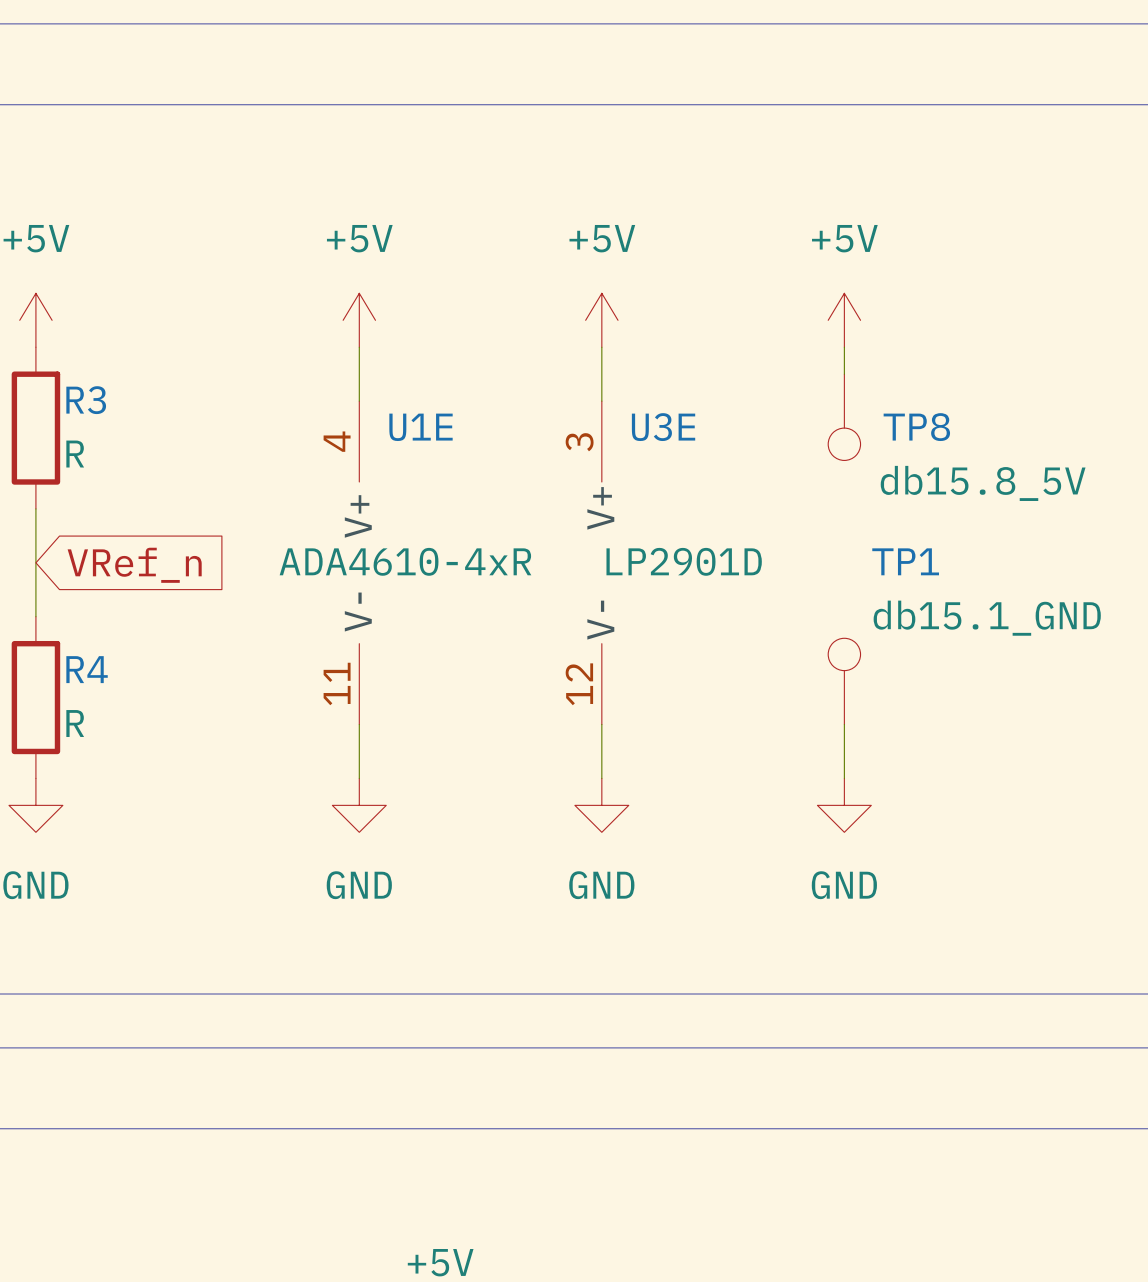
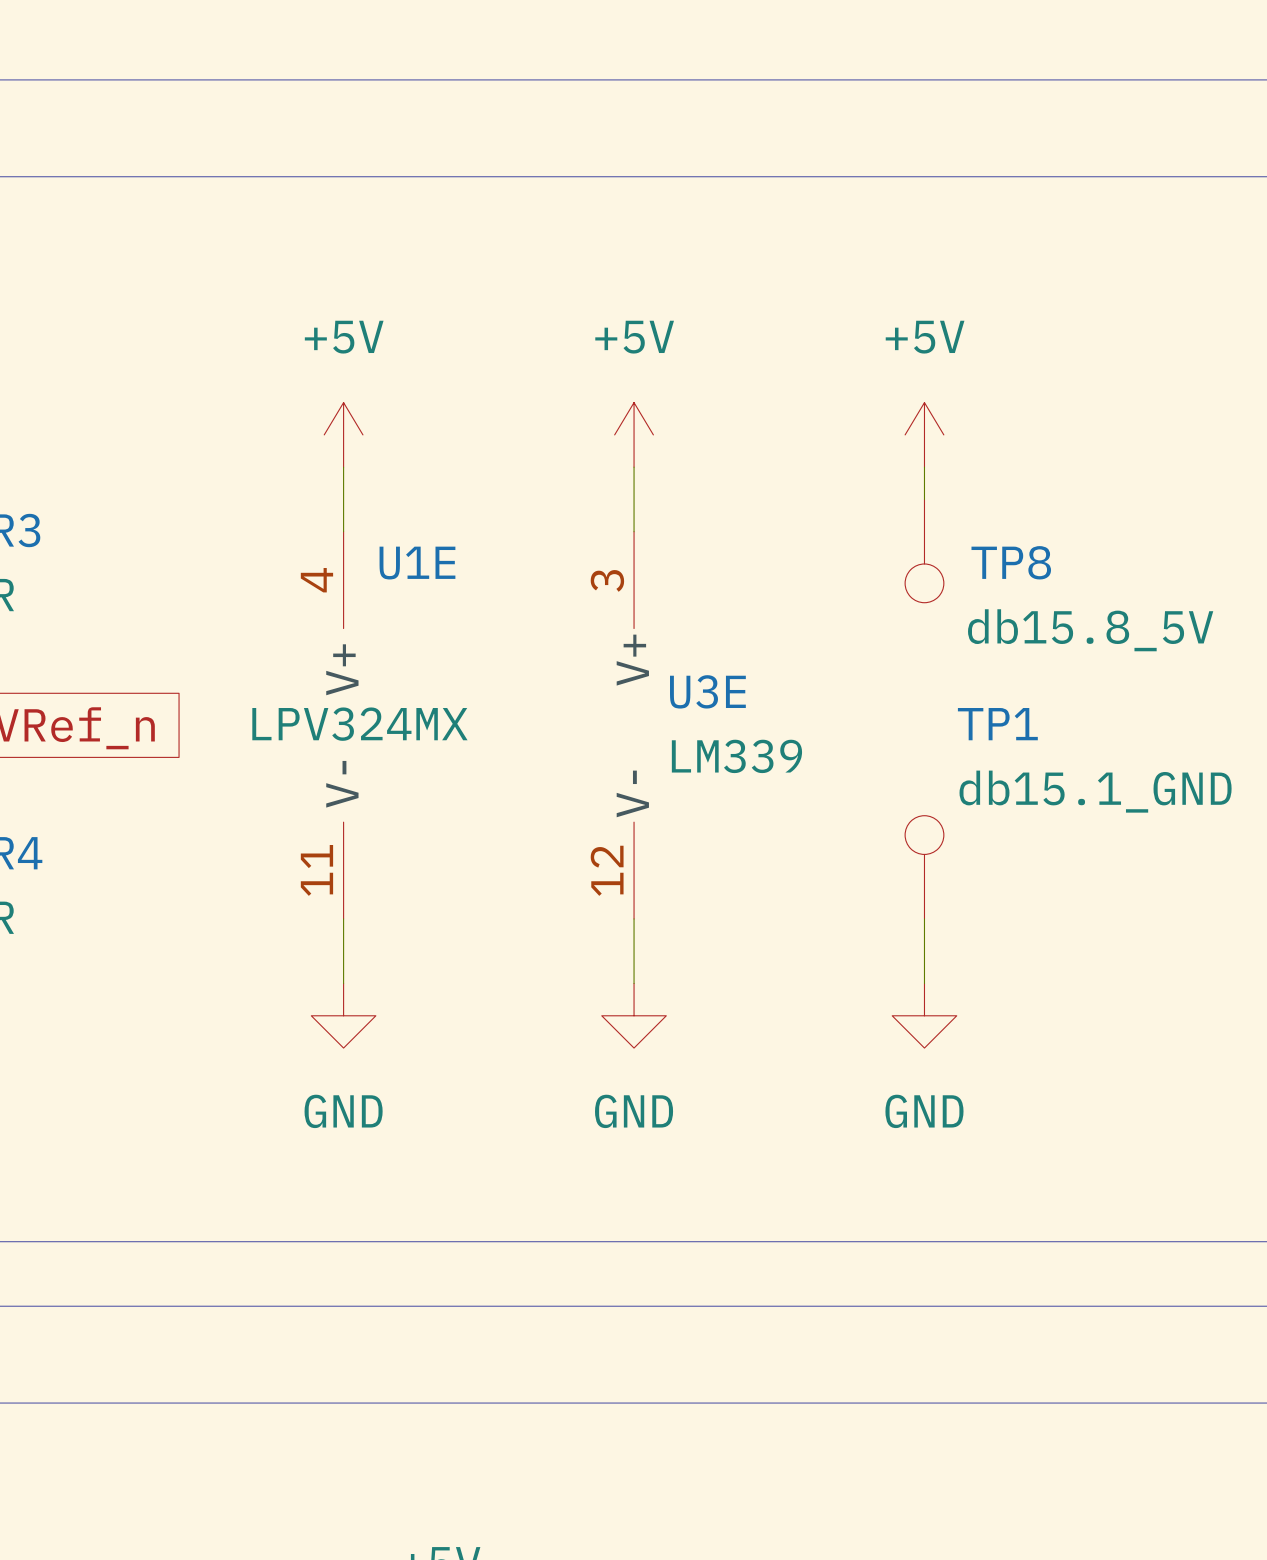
U3E name position: U3E (663, 427) -> U3E (707, 691)
U1E value: ADA4610-4xR (405, 561) -> LPV324MX (359, 724)
U3E value: LP2901D (684, 561) -> LM339 (736, 756)

